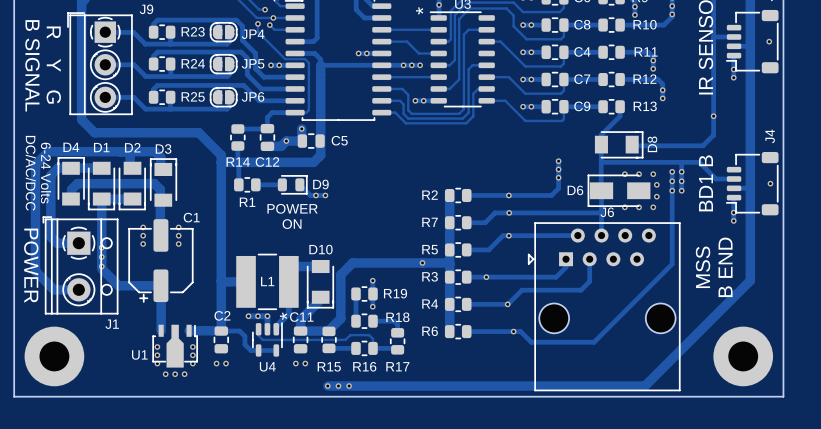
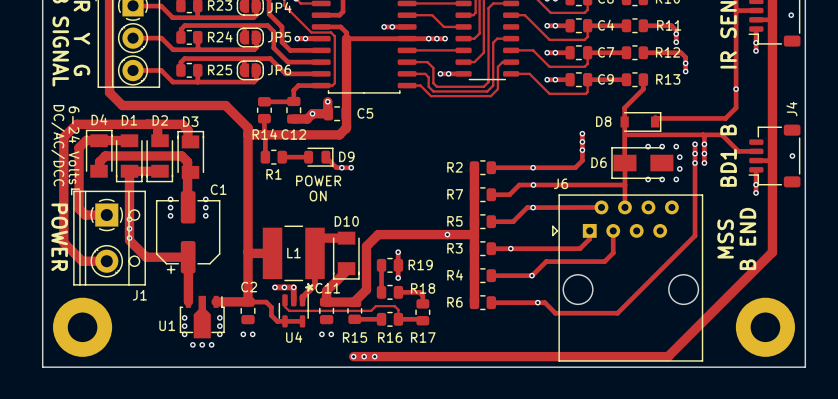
D8 footprint: [594, 131, 644, 159] -> [620, 112, 662, 132]
D8 name position: D8 (652, 144) -> D8 (603, 121)
J6 name position: J6 (607, 212) -> J6 (561, 183)

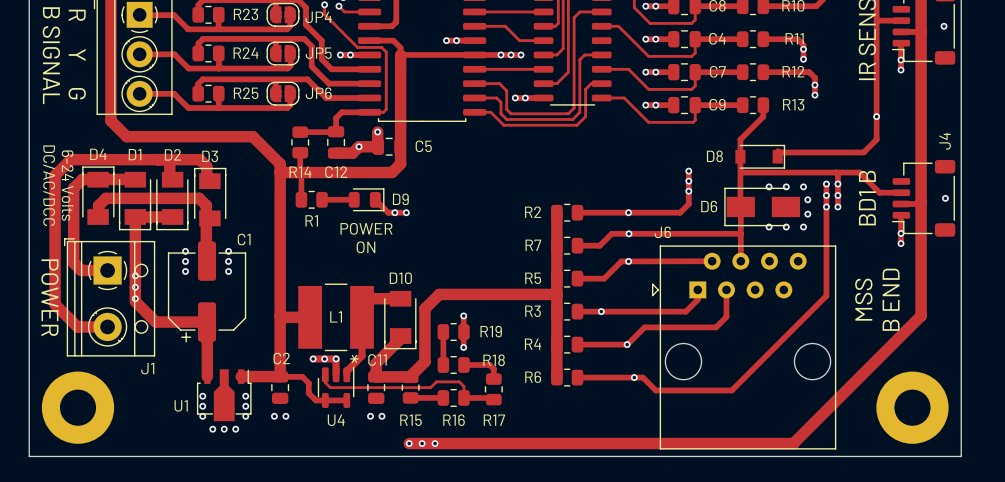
via: (447, 234) -> none

